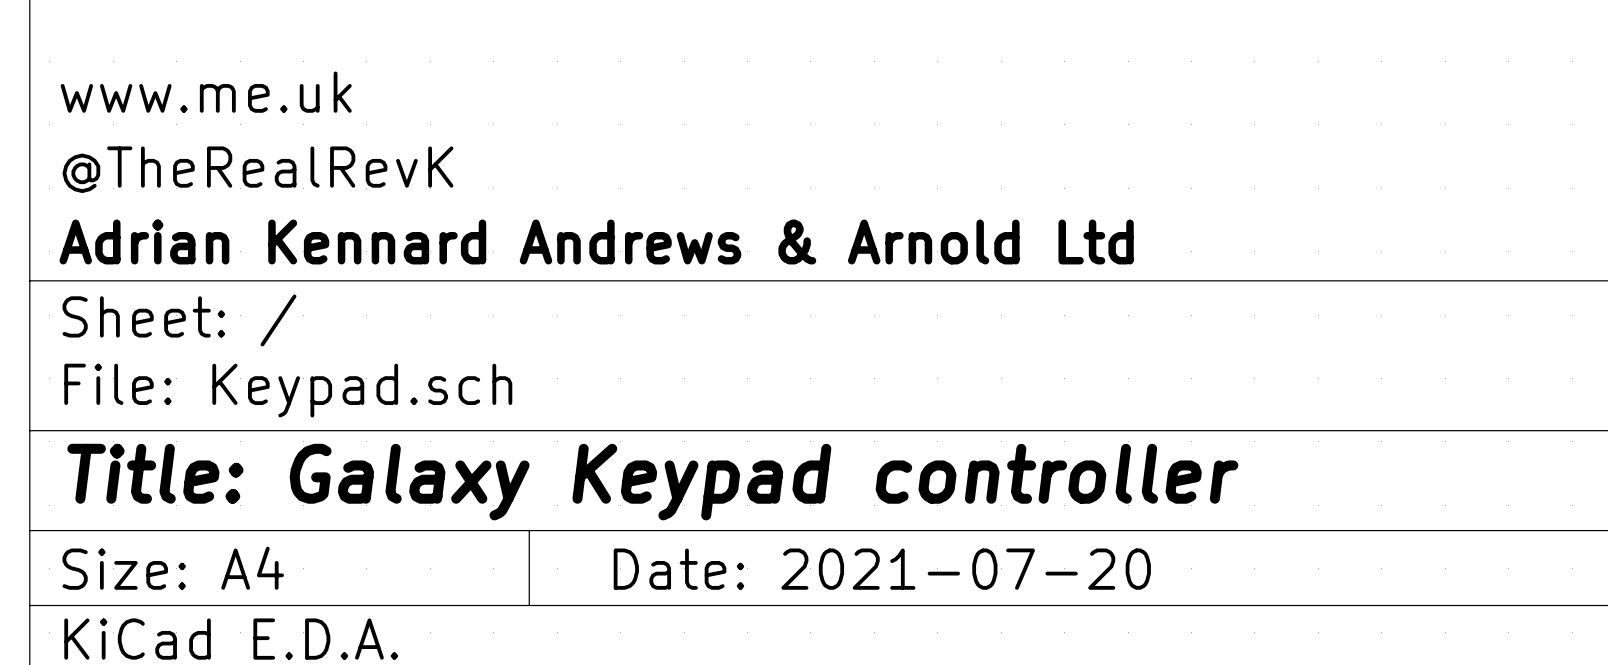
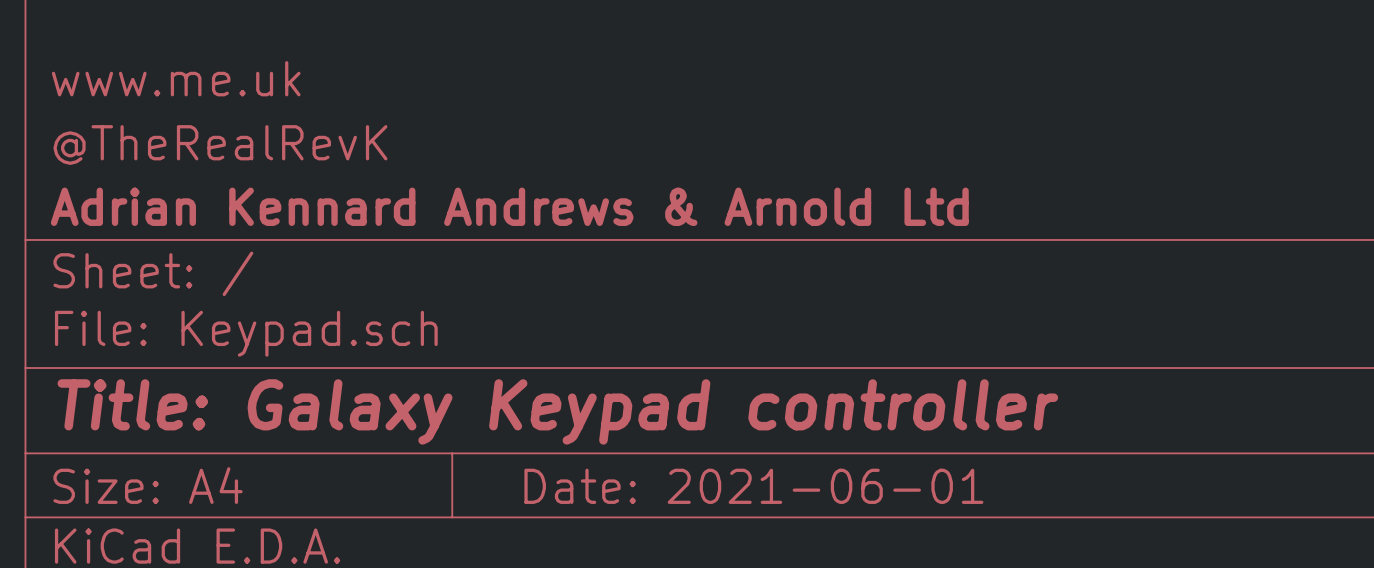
title block: Date: 2021-07-20 (882, 569) -> Date: 2021-06-01 (753, 486)

